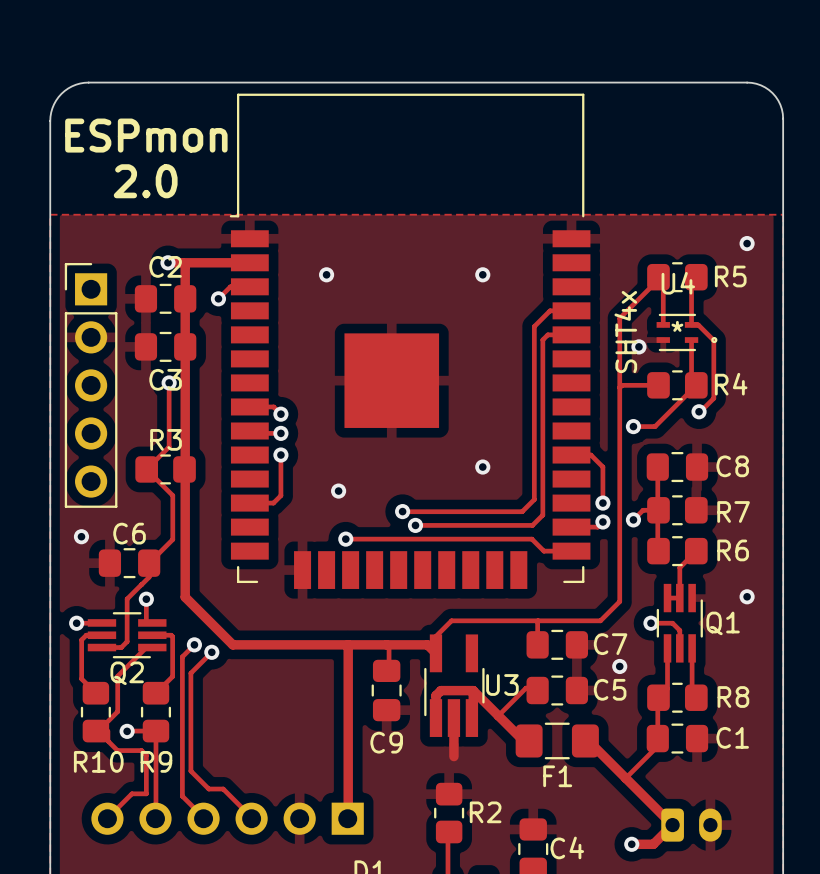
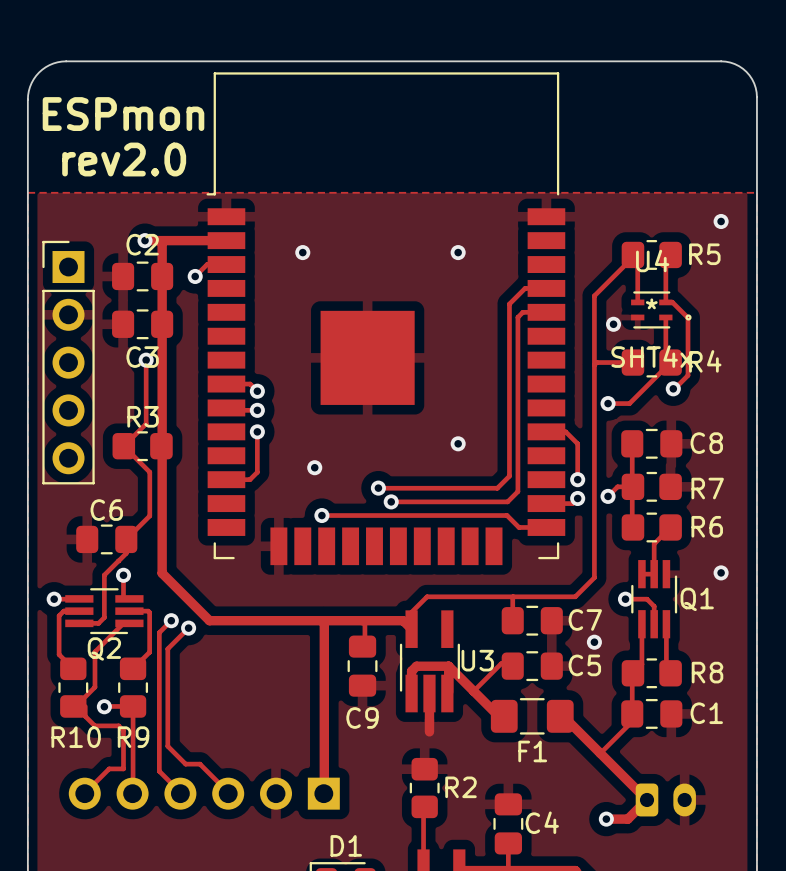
text: 2.0 (145, 181) -> rev2.0 (124, 159)
U4 value rotation: 0° (625, 332) -> 90° clockwise (652, 356)
via: (81, 536) -> none

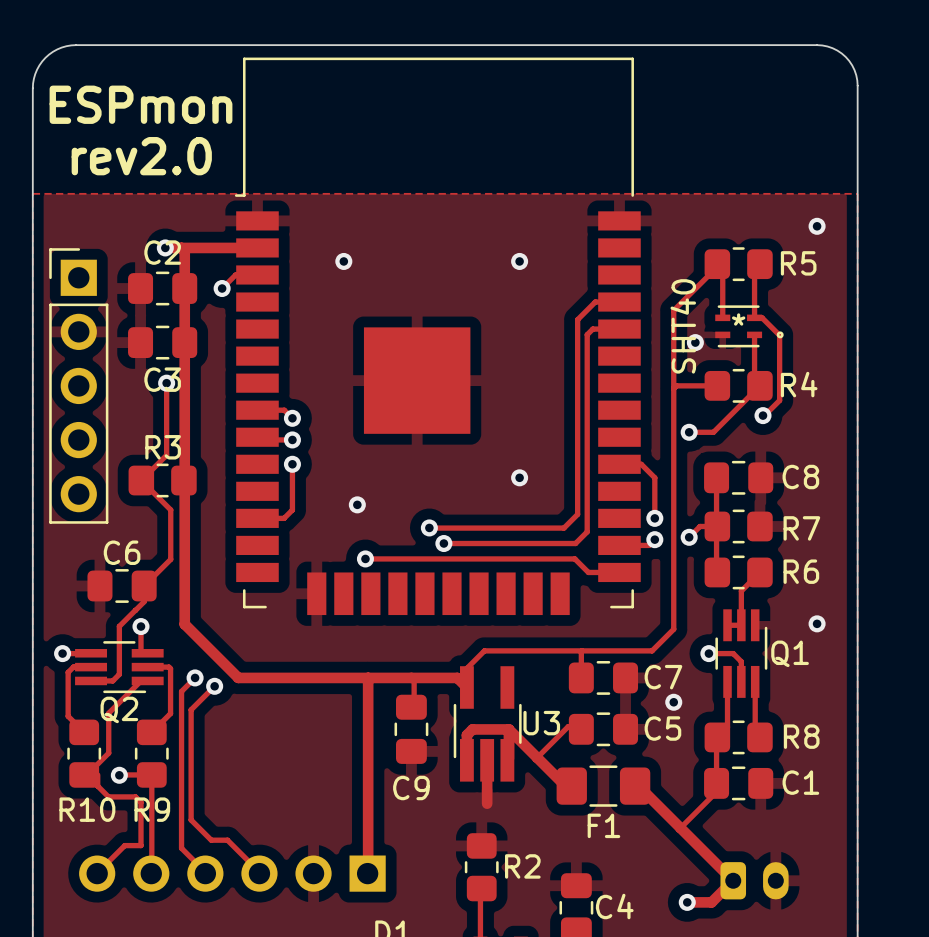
U4 name: U4 (652, 260) -> none
U4 value: SHT4x (652, 356) -> SHT40 (683, 326)

